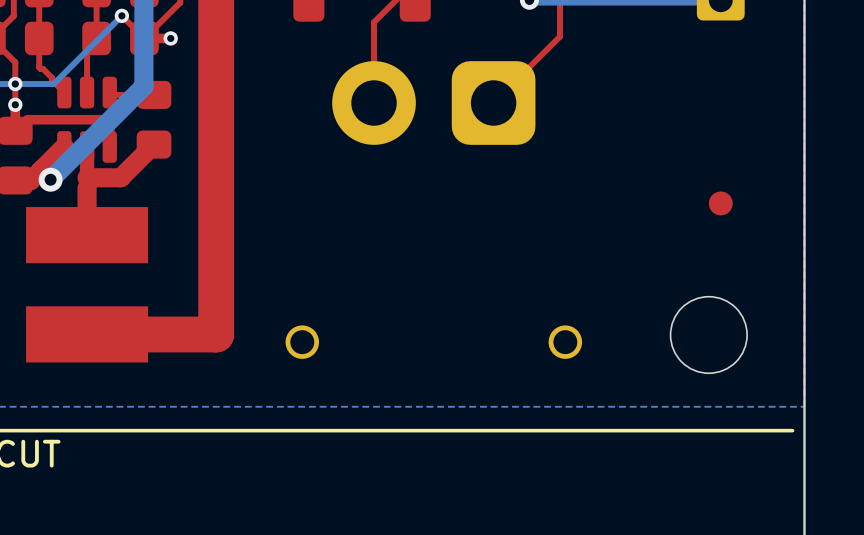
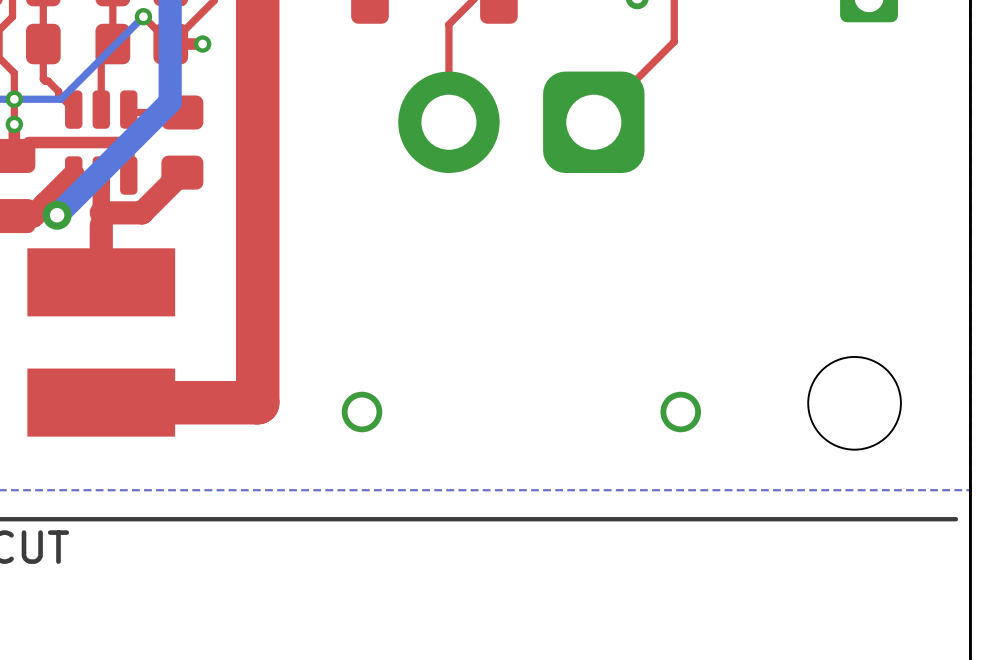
part: (720, 203) -> none

